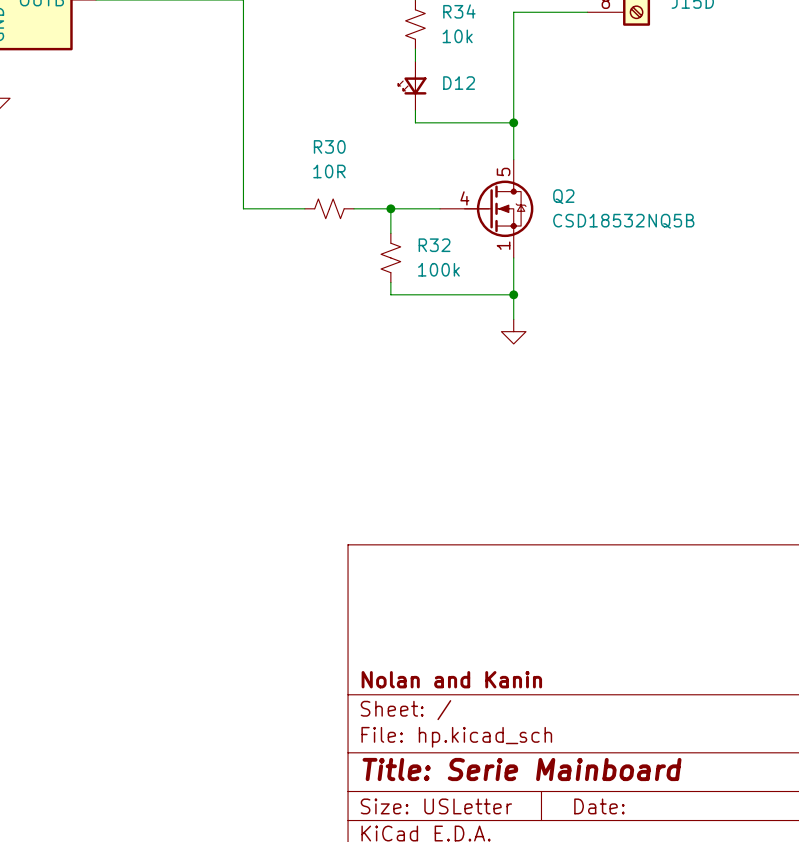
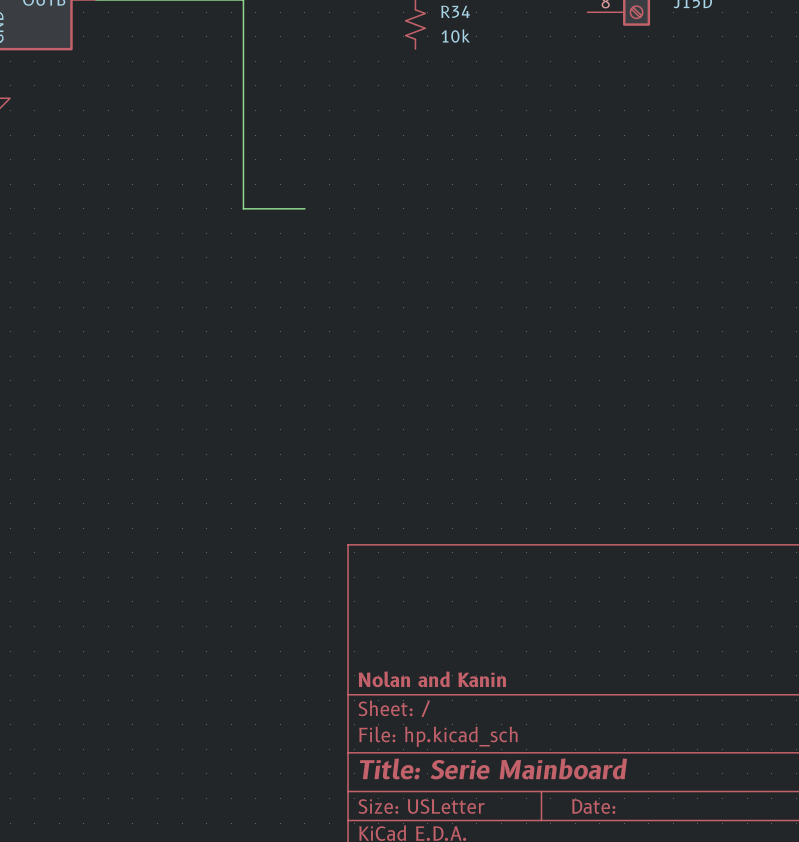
wire: (587, 12) (513, 12) (513, 159) -> none
wire: (415, 49) (415, 61) -> none
D12: (412, 85) -> none
wire: (415, 110) (415, 122) (513, 122) -> none
junction: (513, 122) -> none
R30: 10R (329, 208) -> none
wire: (354, 208) (440, 208) -> none
wire: (390, 208) (390, 233) -> none
junction: (390, 208) -> none
Q2: CSD18532NQ5B (486, 208) -> none
R32: 100k (390, 257) -> none
wire: (513, 257) (513, 319) -> none
wire: (390, 282) (390, 294) (513, 294) -> none
junction: (513, 294) -> none
power symbol: (513, 331) -> none

